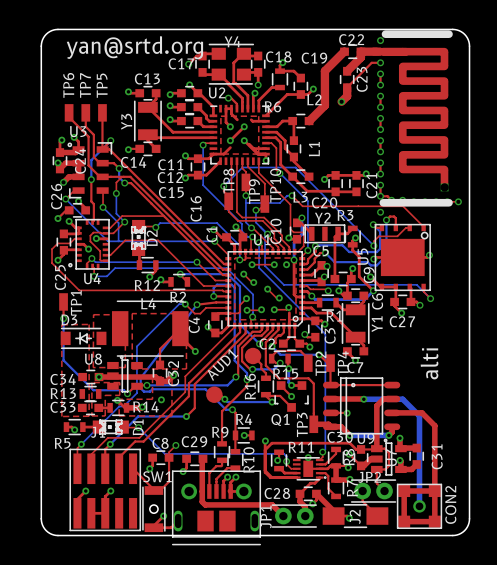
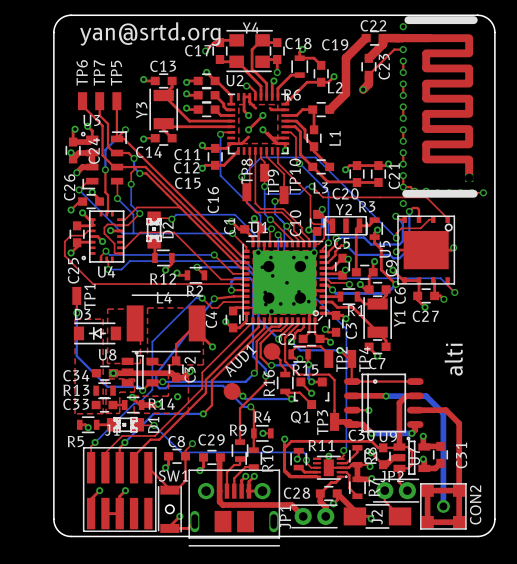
U1 footprint: [225, 248, 306, 329] -> [242, 240, 327, 325]

